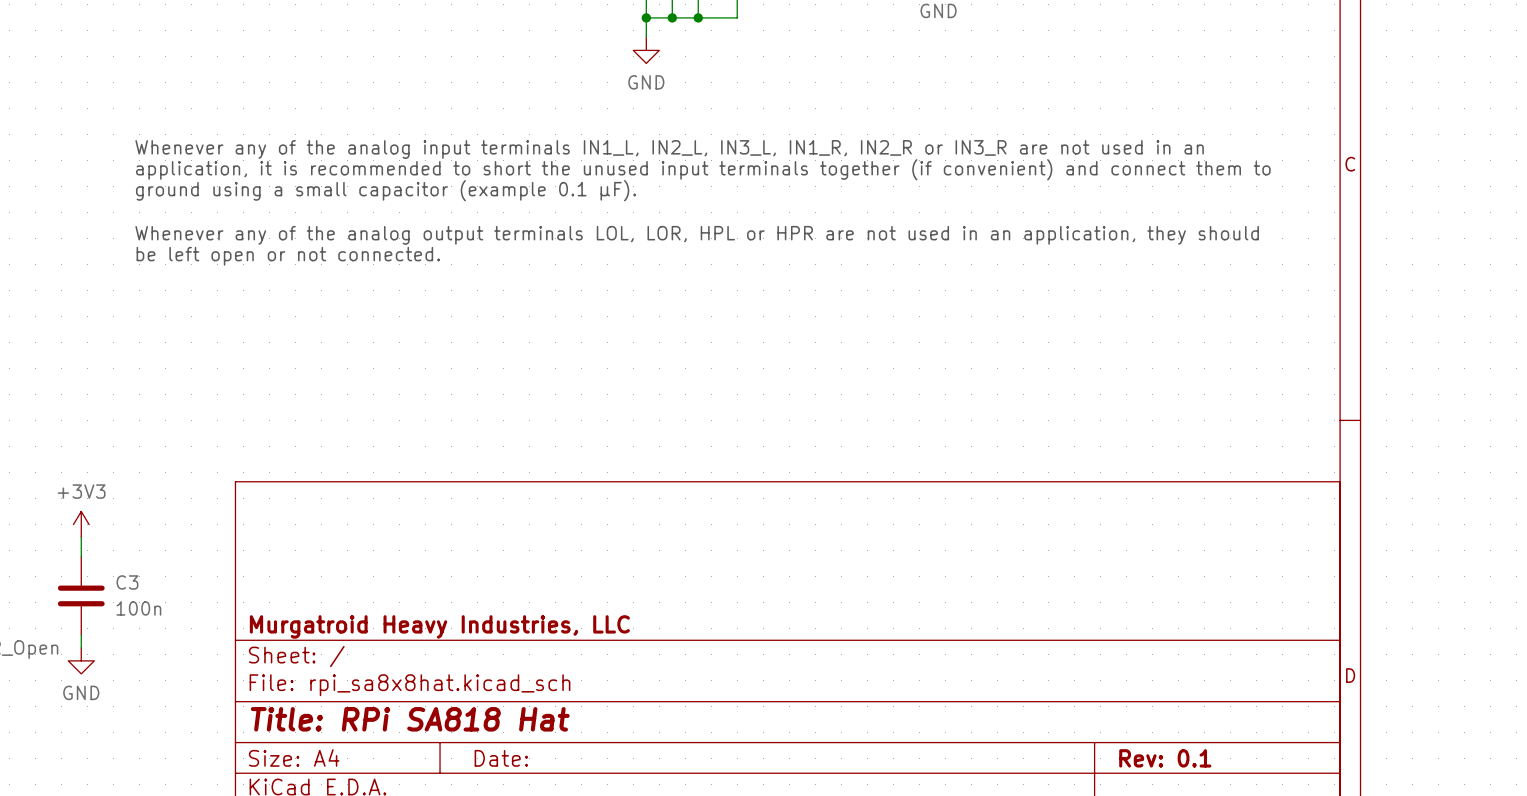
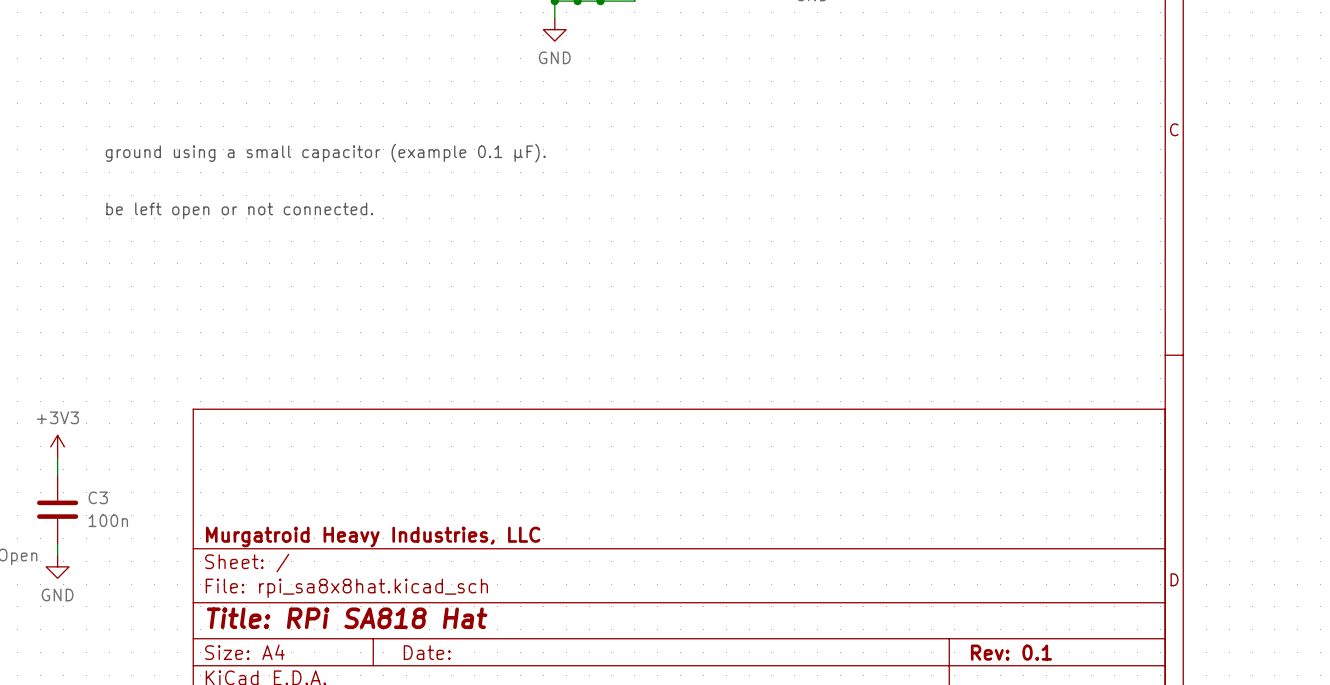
text: Whenever any of the analog input terminals IN1_L, IN2_L, IN3_L, IN1_R, IN2_R or IN3_R are not used in an (669, 149) -> none
text: application, it is recommended to short the unused input terminals together (if convenient) and connect them to (703, 169) -> none
text: Whenever any of the analog output terminals LOL, LOR, HPL or HPR are not used in an application, they should (697, 235) -> none

